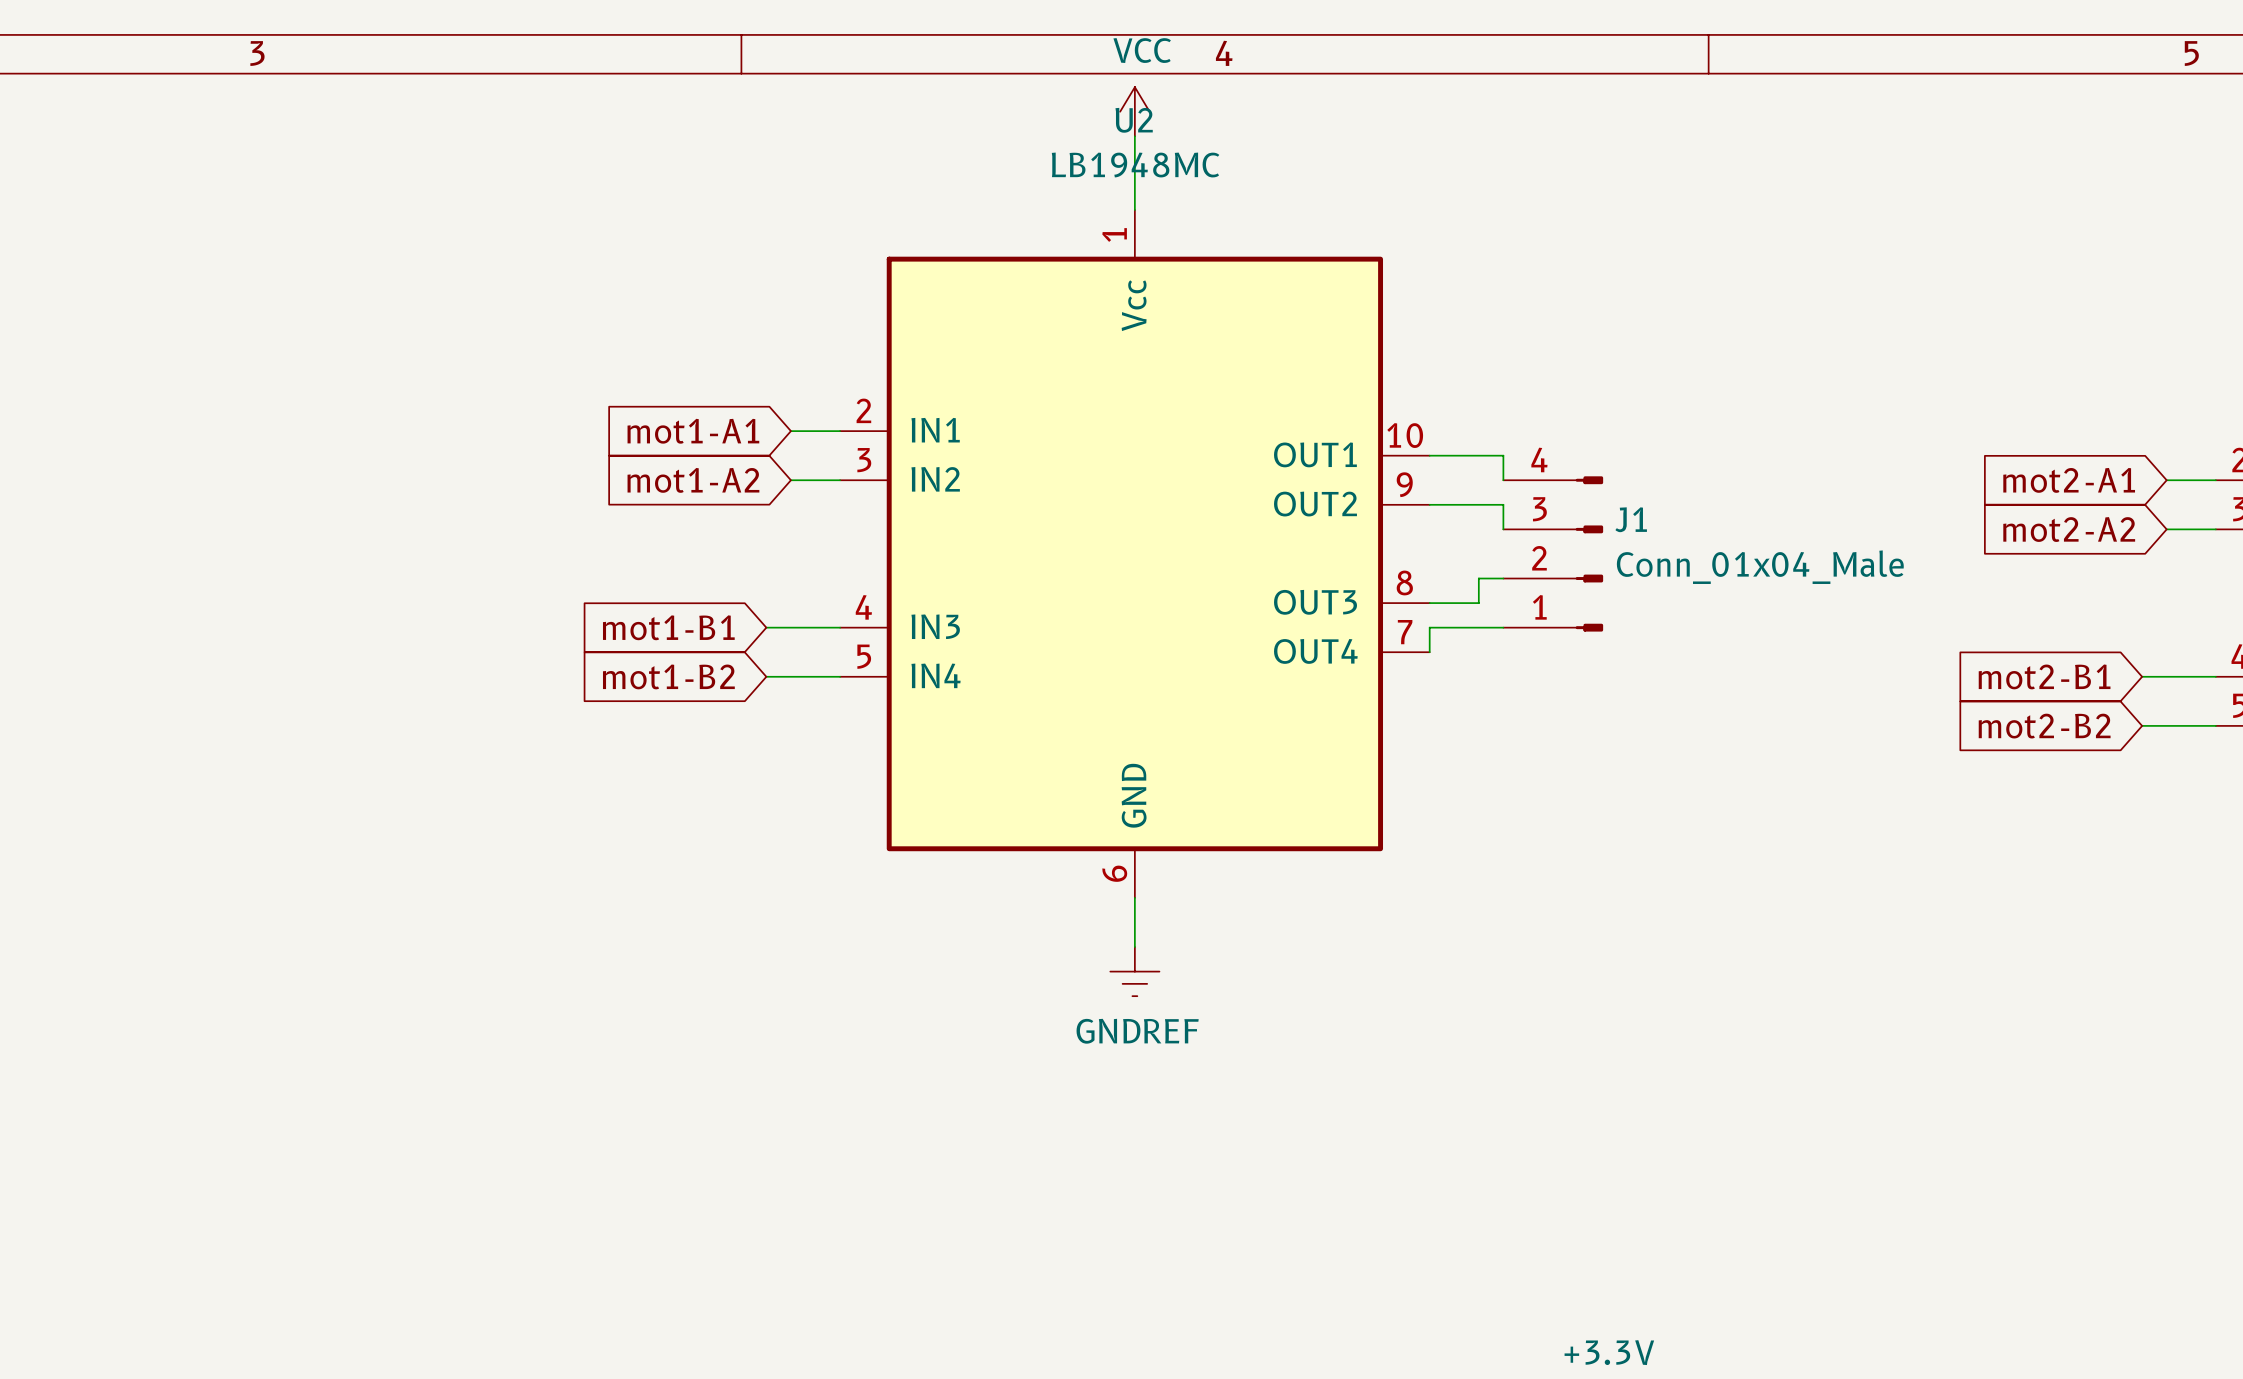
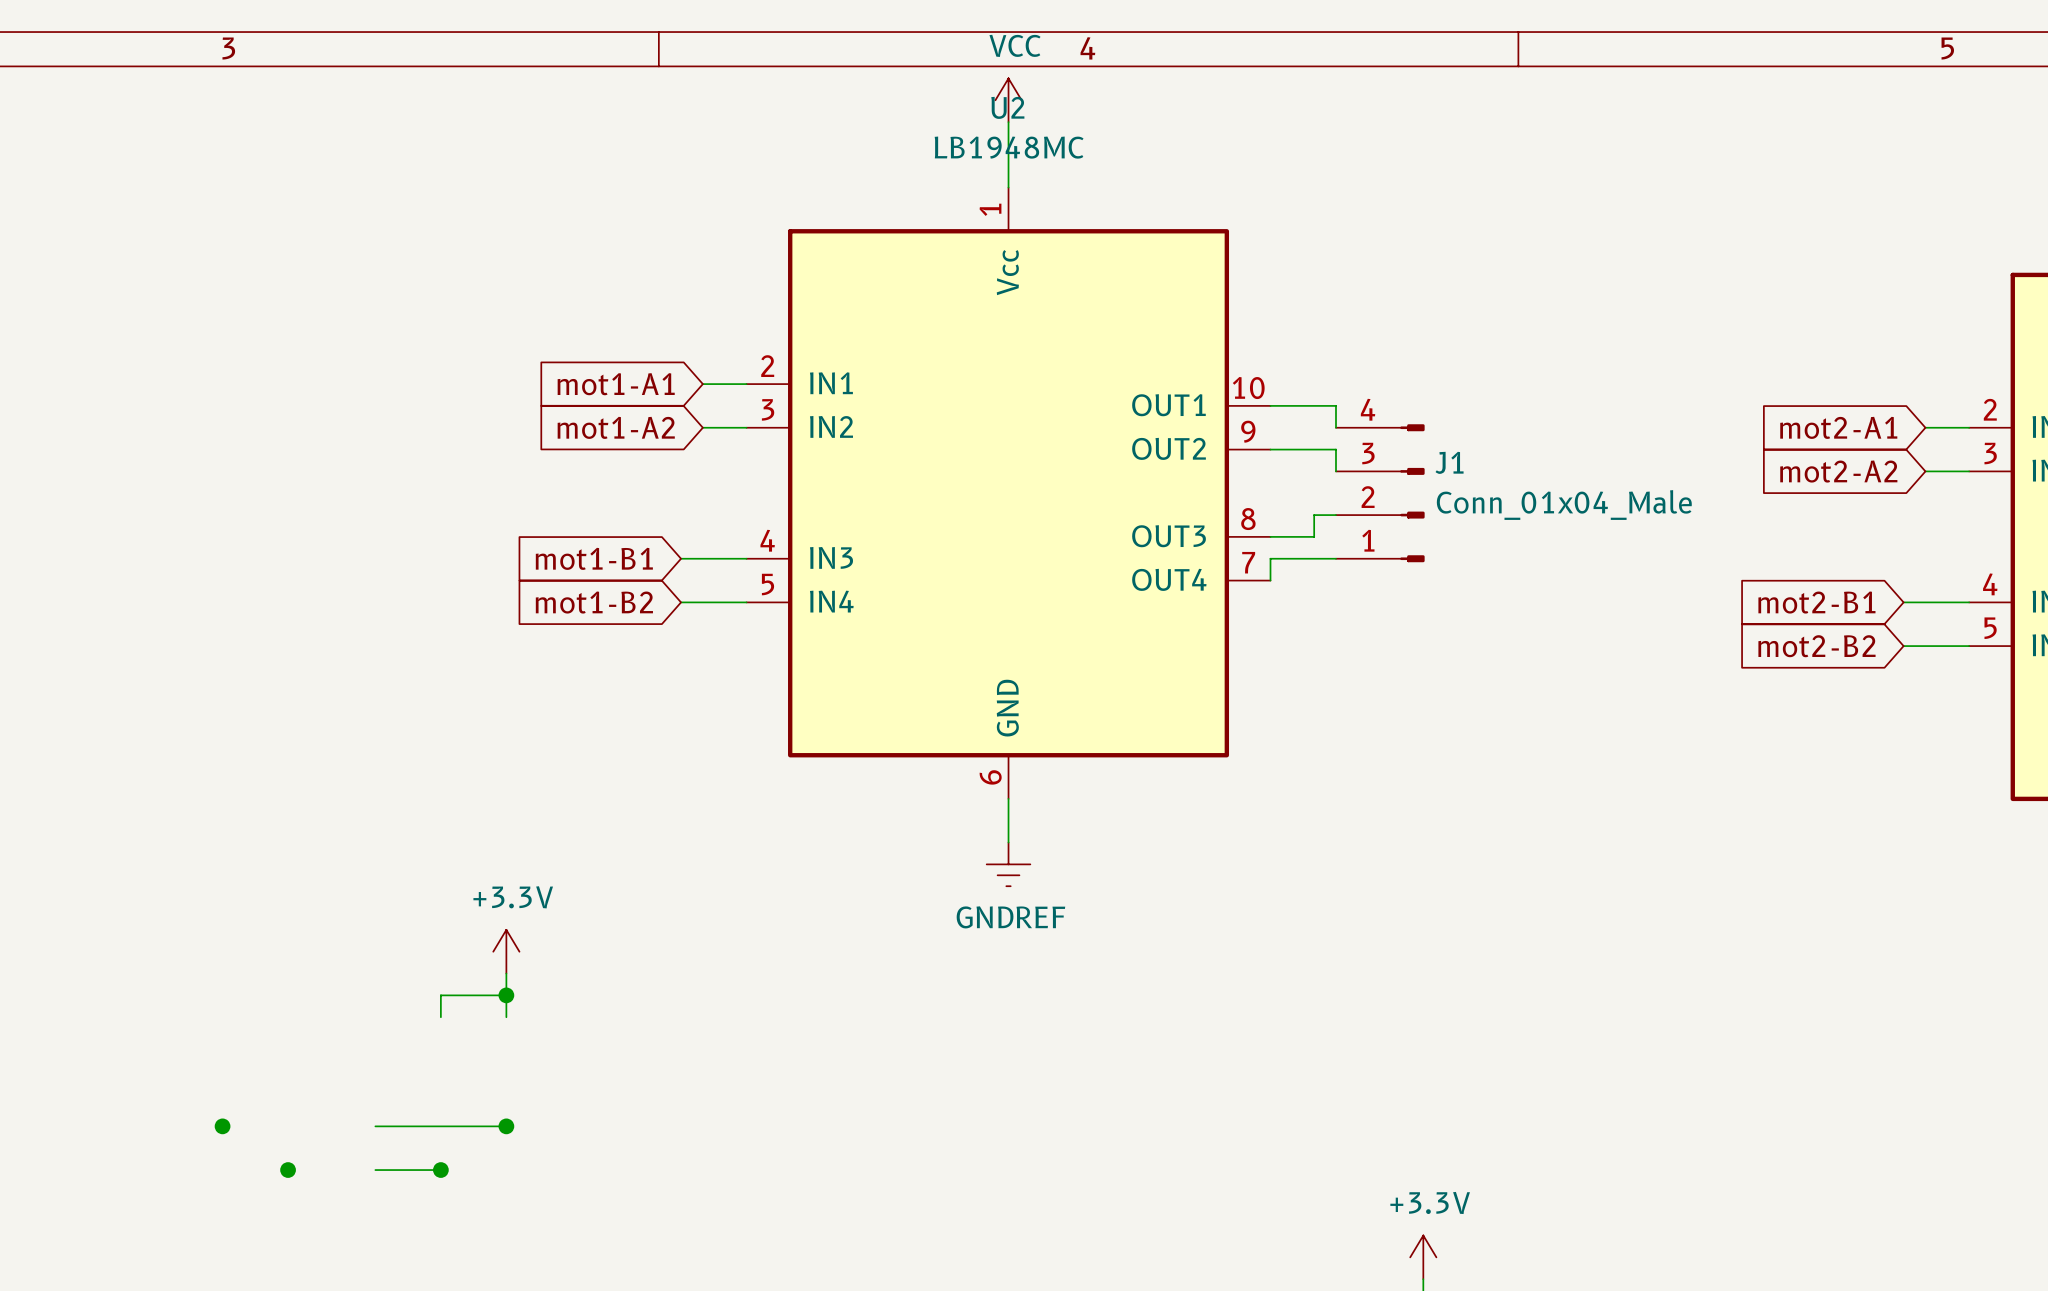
power symbol: none -> +3.3V (506, 951)
wire: none -> (506, 973) (506, 1017)
wire: none -> (506, 995) (440, 995) (440, 1017)
junction: none -> (506, 995)
junction: none -> (222, 1126)
wire: none -> (375, 1126) (506, 1126)
junction: none -> (506, 1126)
junction: none -> (288, 1170)
wire: none -> (375, 1170) (440, 1170)
junction: none -> (440, 1170)

